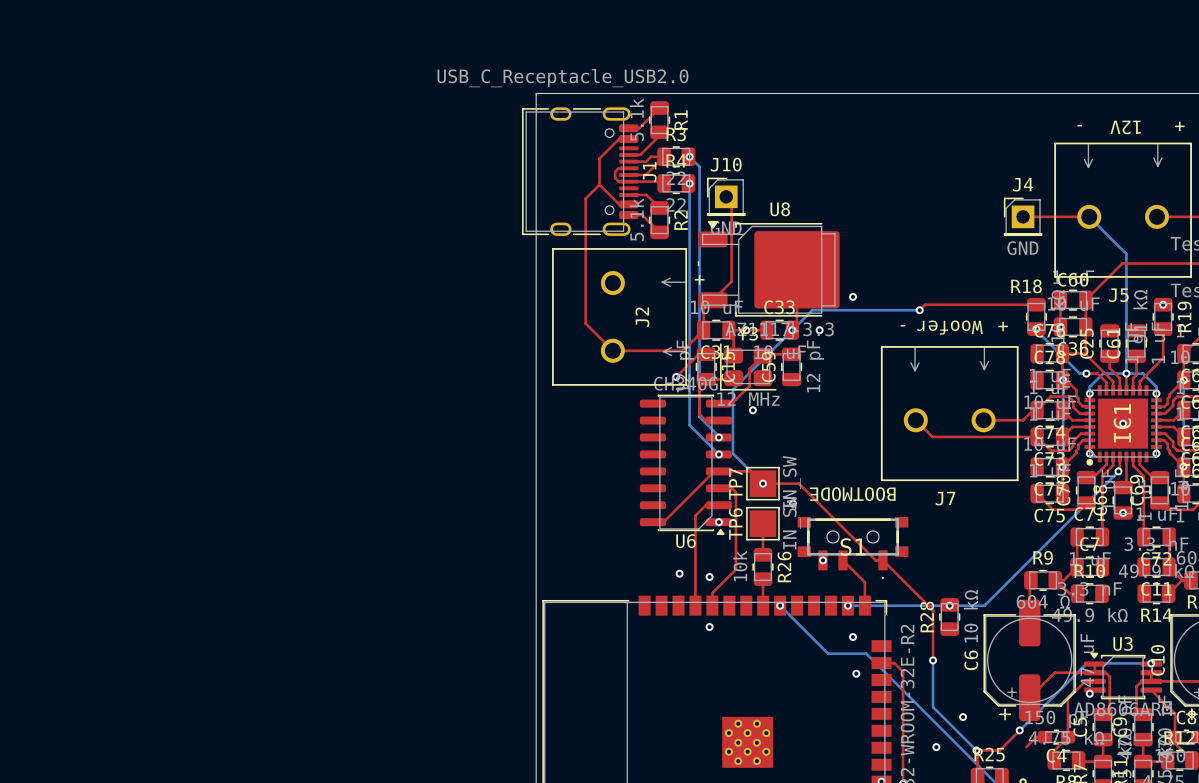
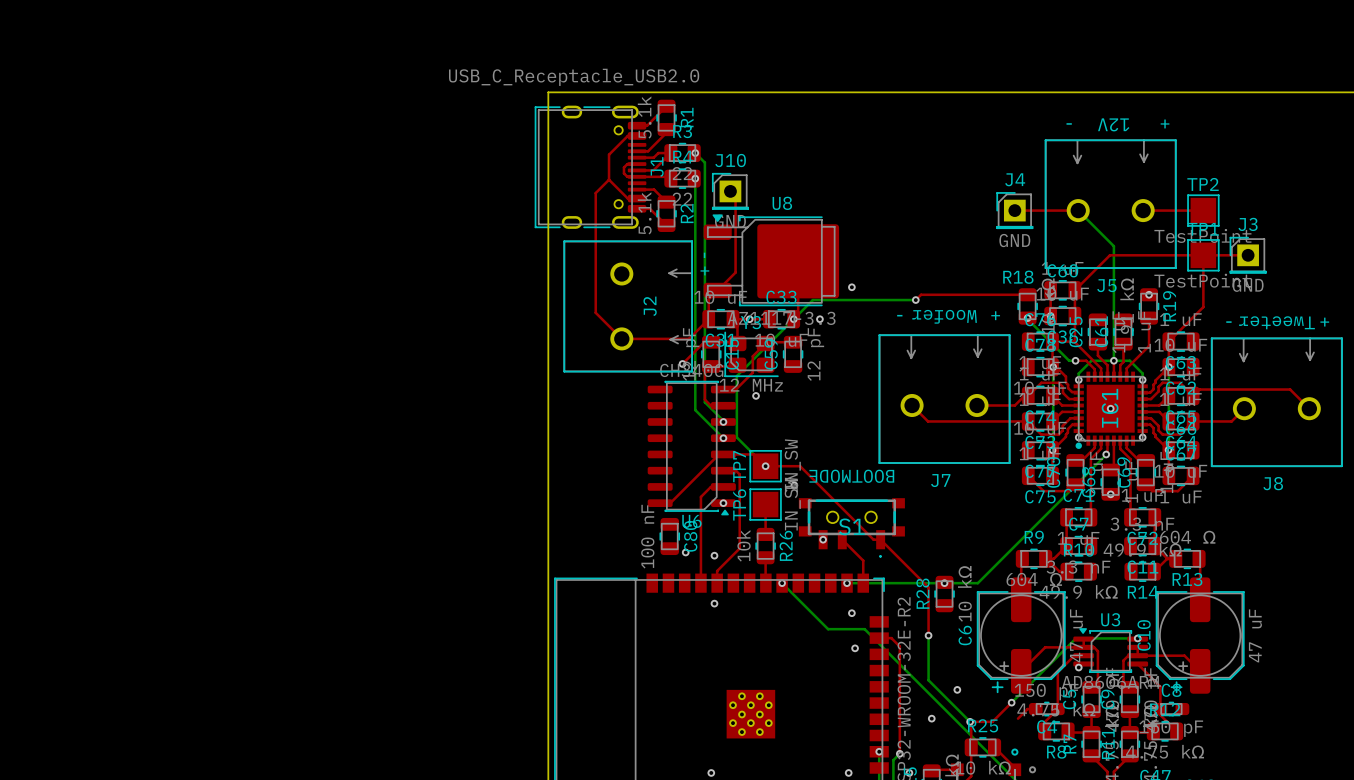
C80: none -> 100 nF (669, 536)

